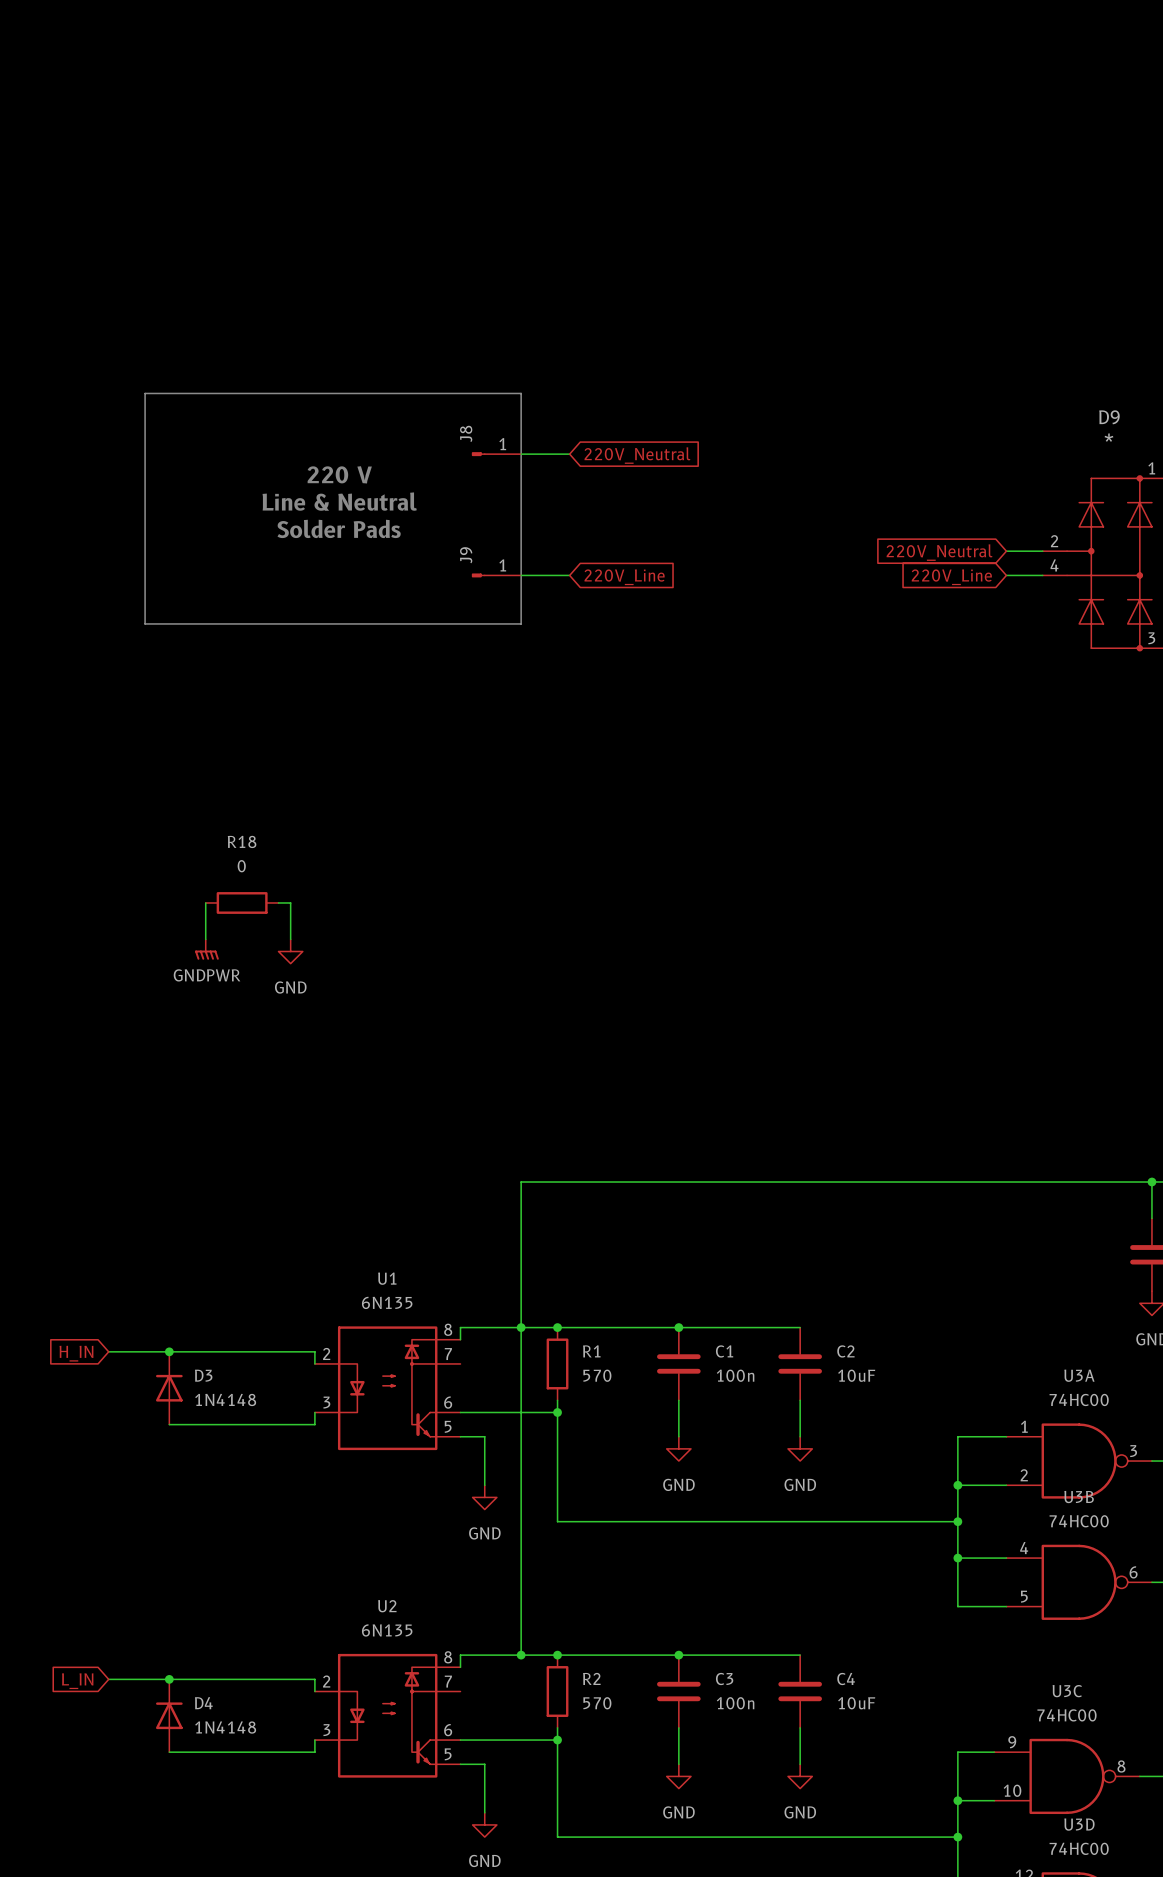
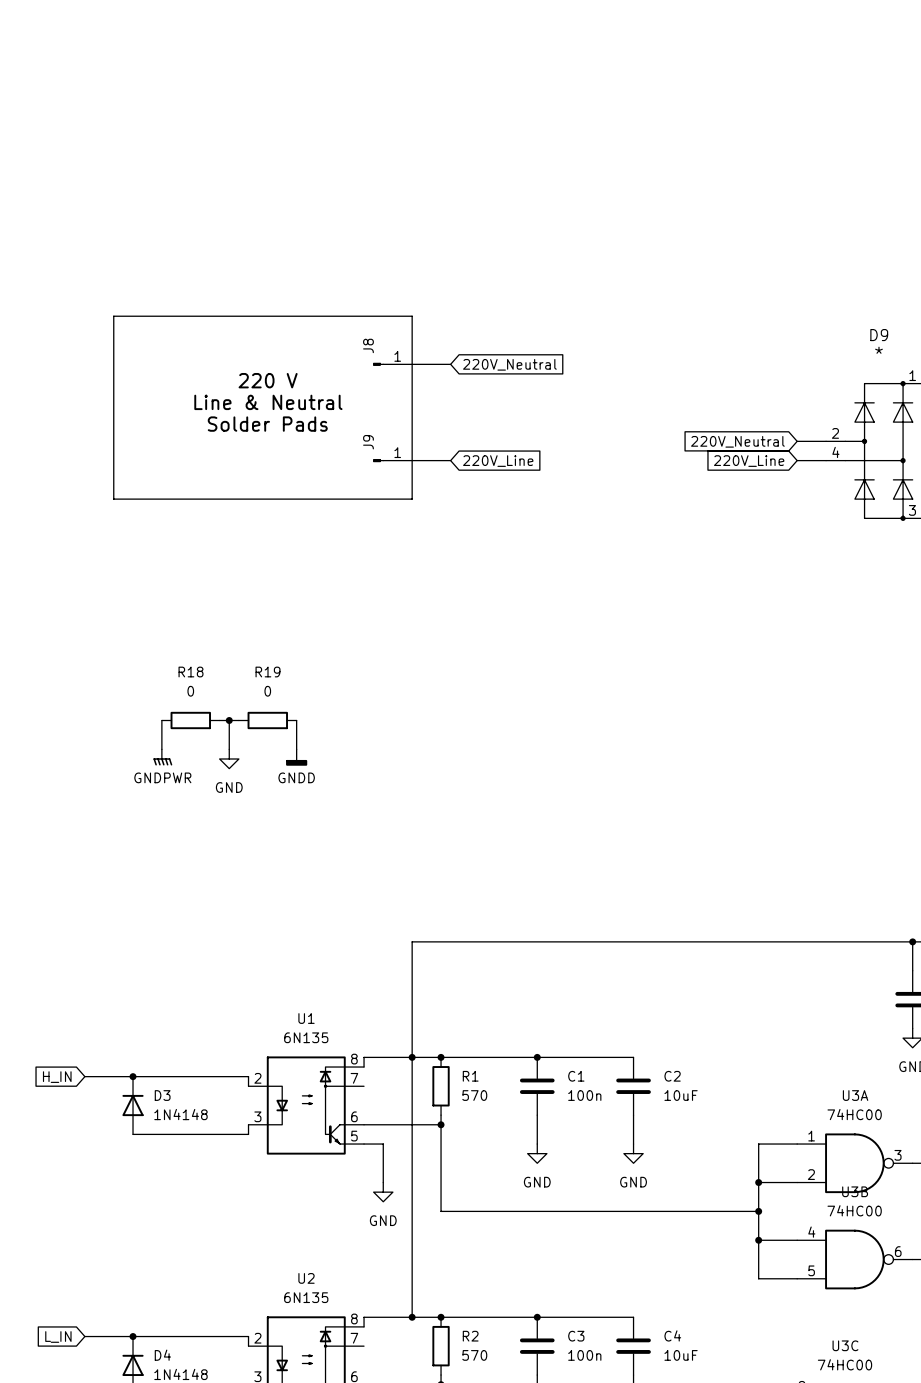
wire: none -> (229, 720) (238, 720)
junction: none -> (229, 720)
R19: none -> 0 (267, 720)
wire: none -> (296, 720) (296, 749)
power symbol: none -> GNDD (296, 757)

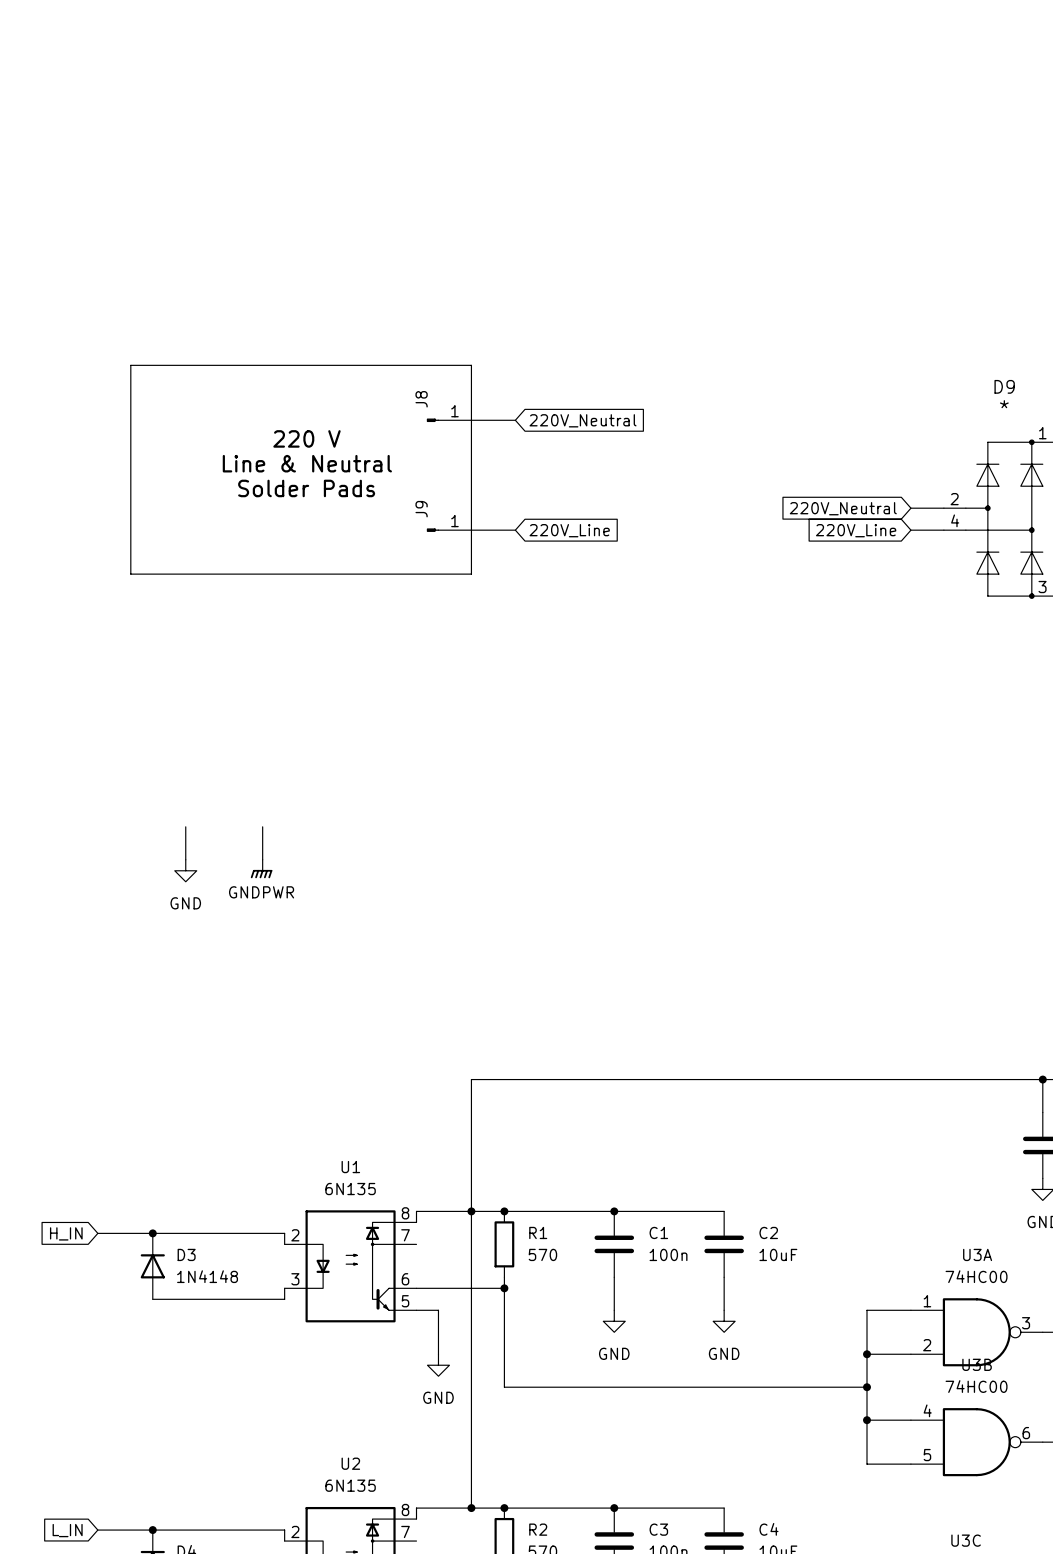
R18: 0 (190, 720) -> none
wire: (219, 720) (238, 720) -> none
junction: (229, 720) -> none
R19: 0 (267, 720) -> none
wire: (296, 720) (296, 749) -> none
power symbol: GNDPWR (162, 757) -> GND (185, 870)
power symbol: GNDD (296, 757) -> none
power symbol: GND (229, 759) -> GNDPWR (261, 869)

